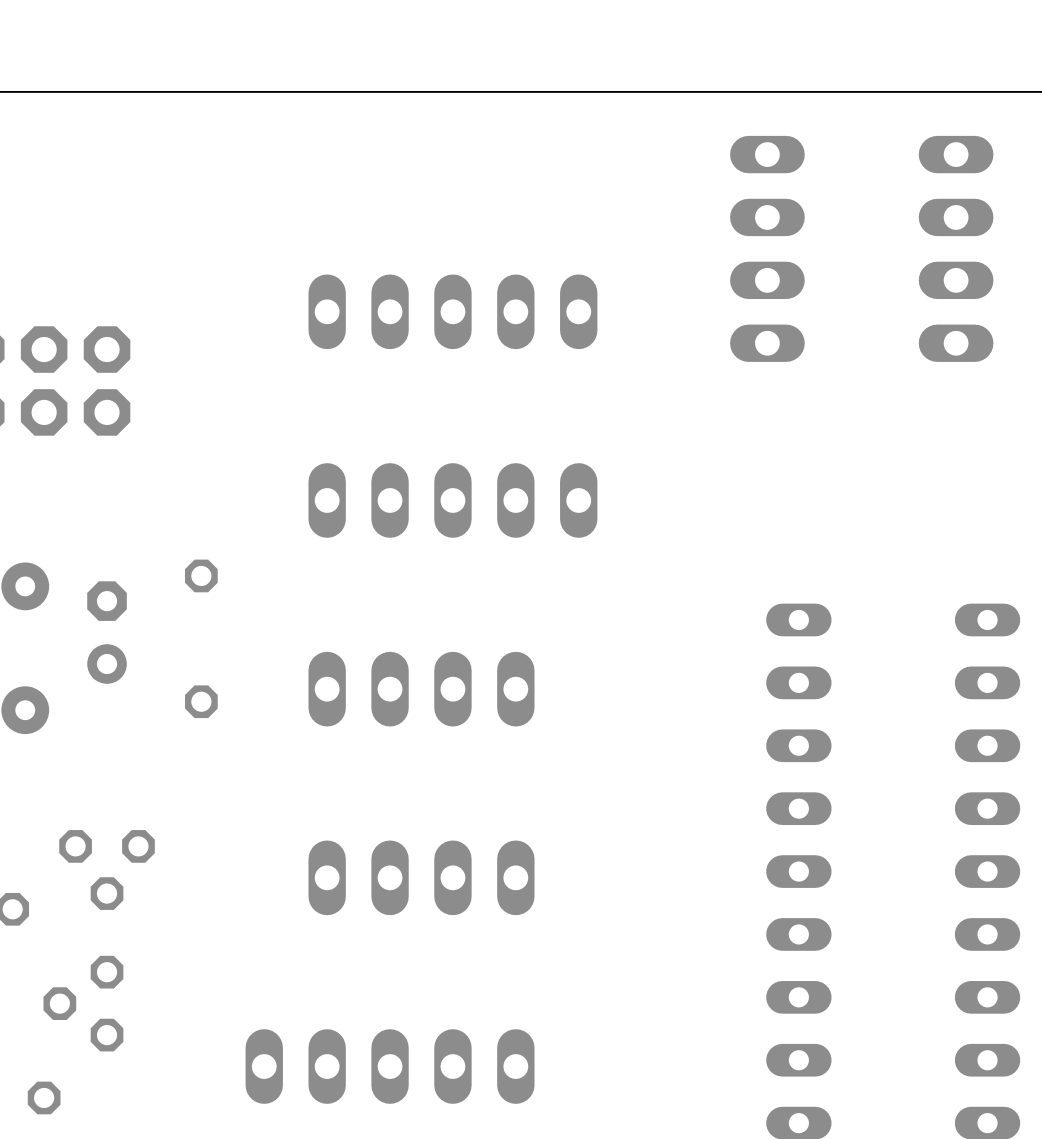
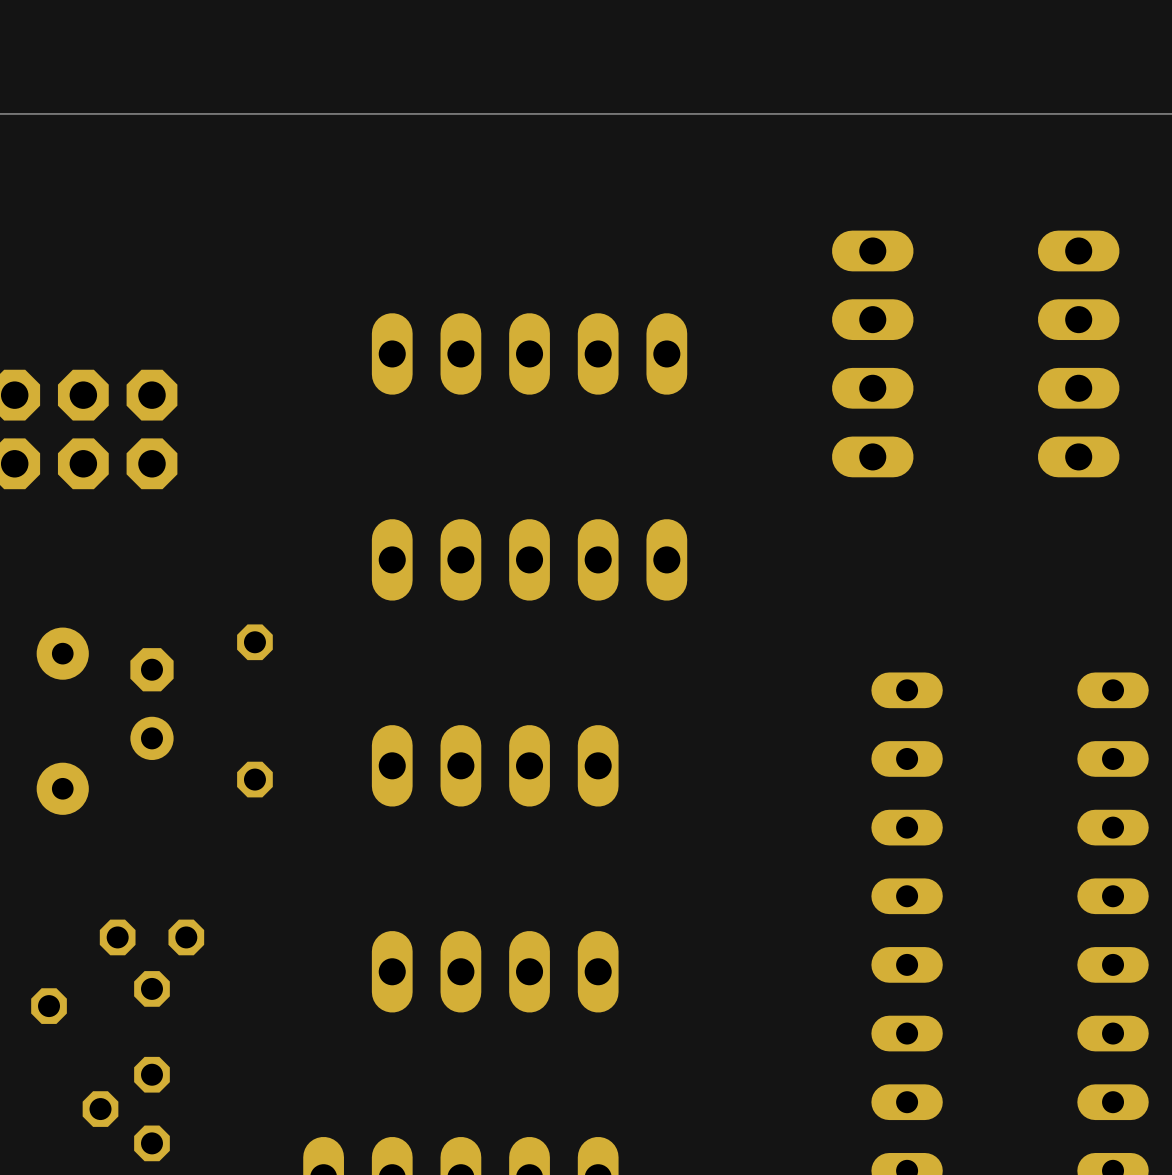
part position: (767, 248) -> (872, 353)
part position: (956, 248) -> (1078, 353)

